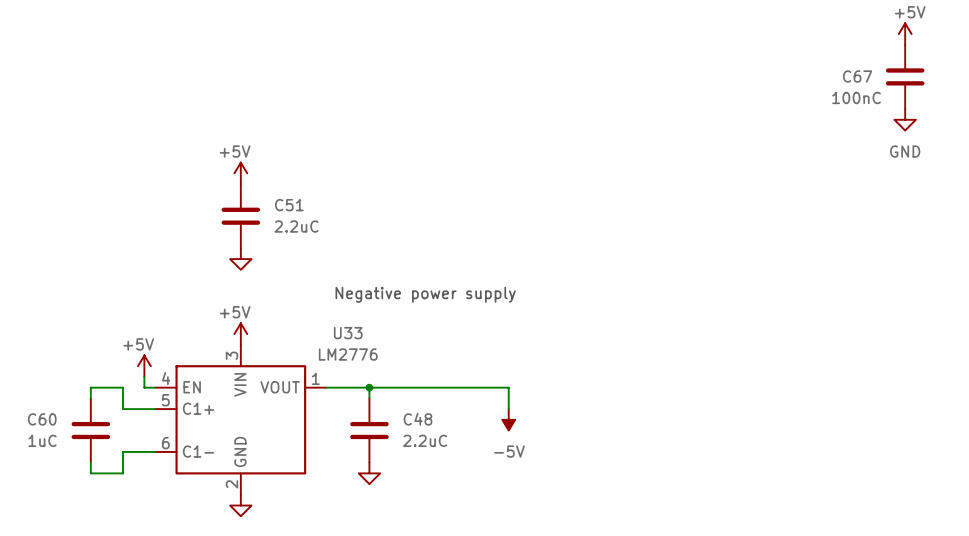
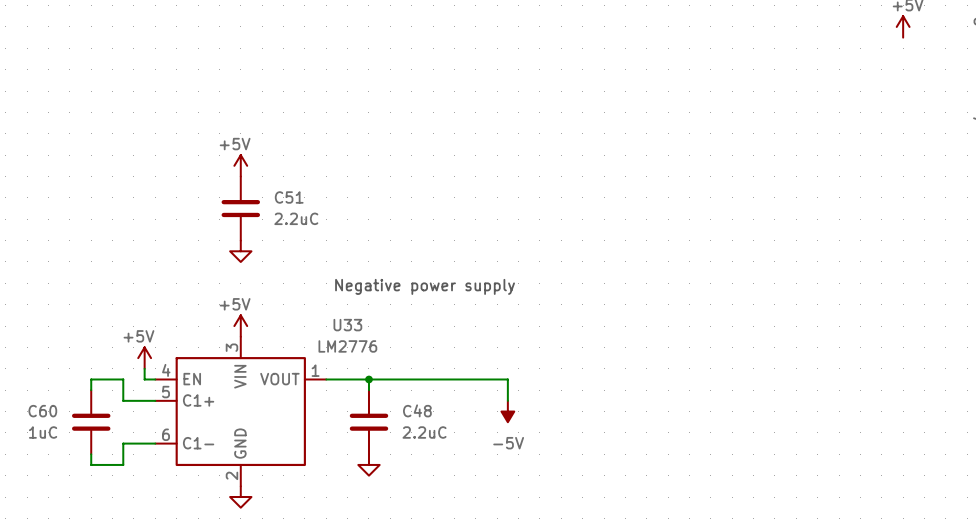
C67: 100nC (905, 76) -> none
power symbol: GND (905, 119) -> none

